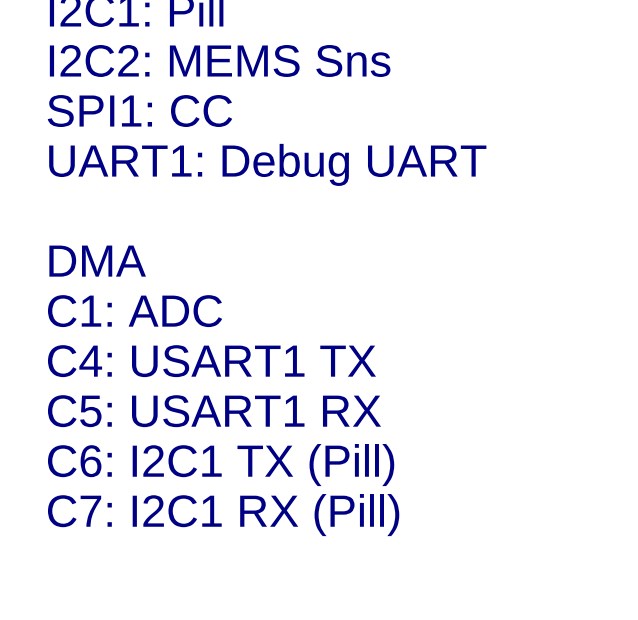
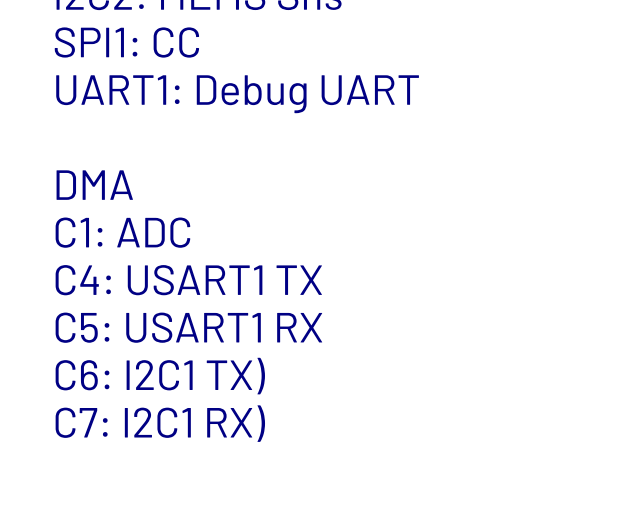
text: C6: I2C1 TX (Pill) (221, 465) -> C6: I2C1 TX) (160, 376)
text: C7: I2C1 RX (Pill) (223, 515) -> C7: I2C1 RX) (160, 423)

